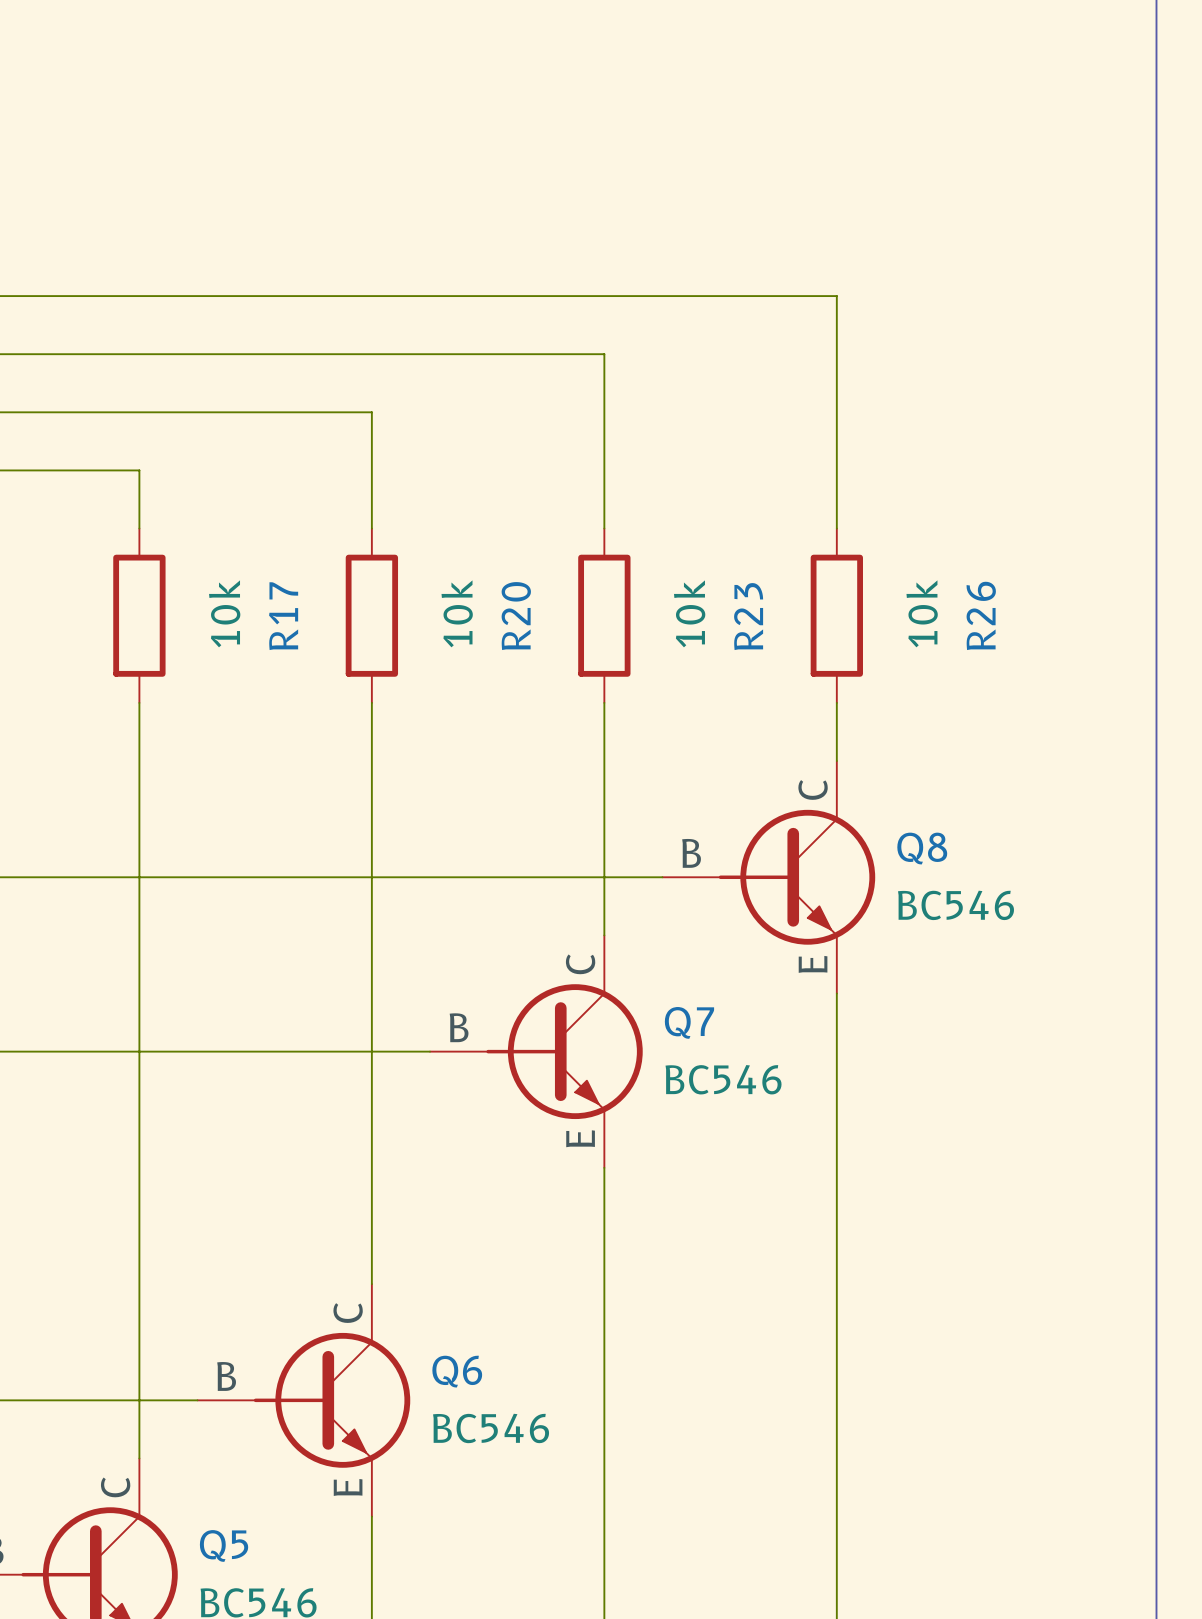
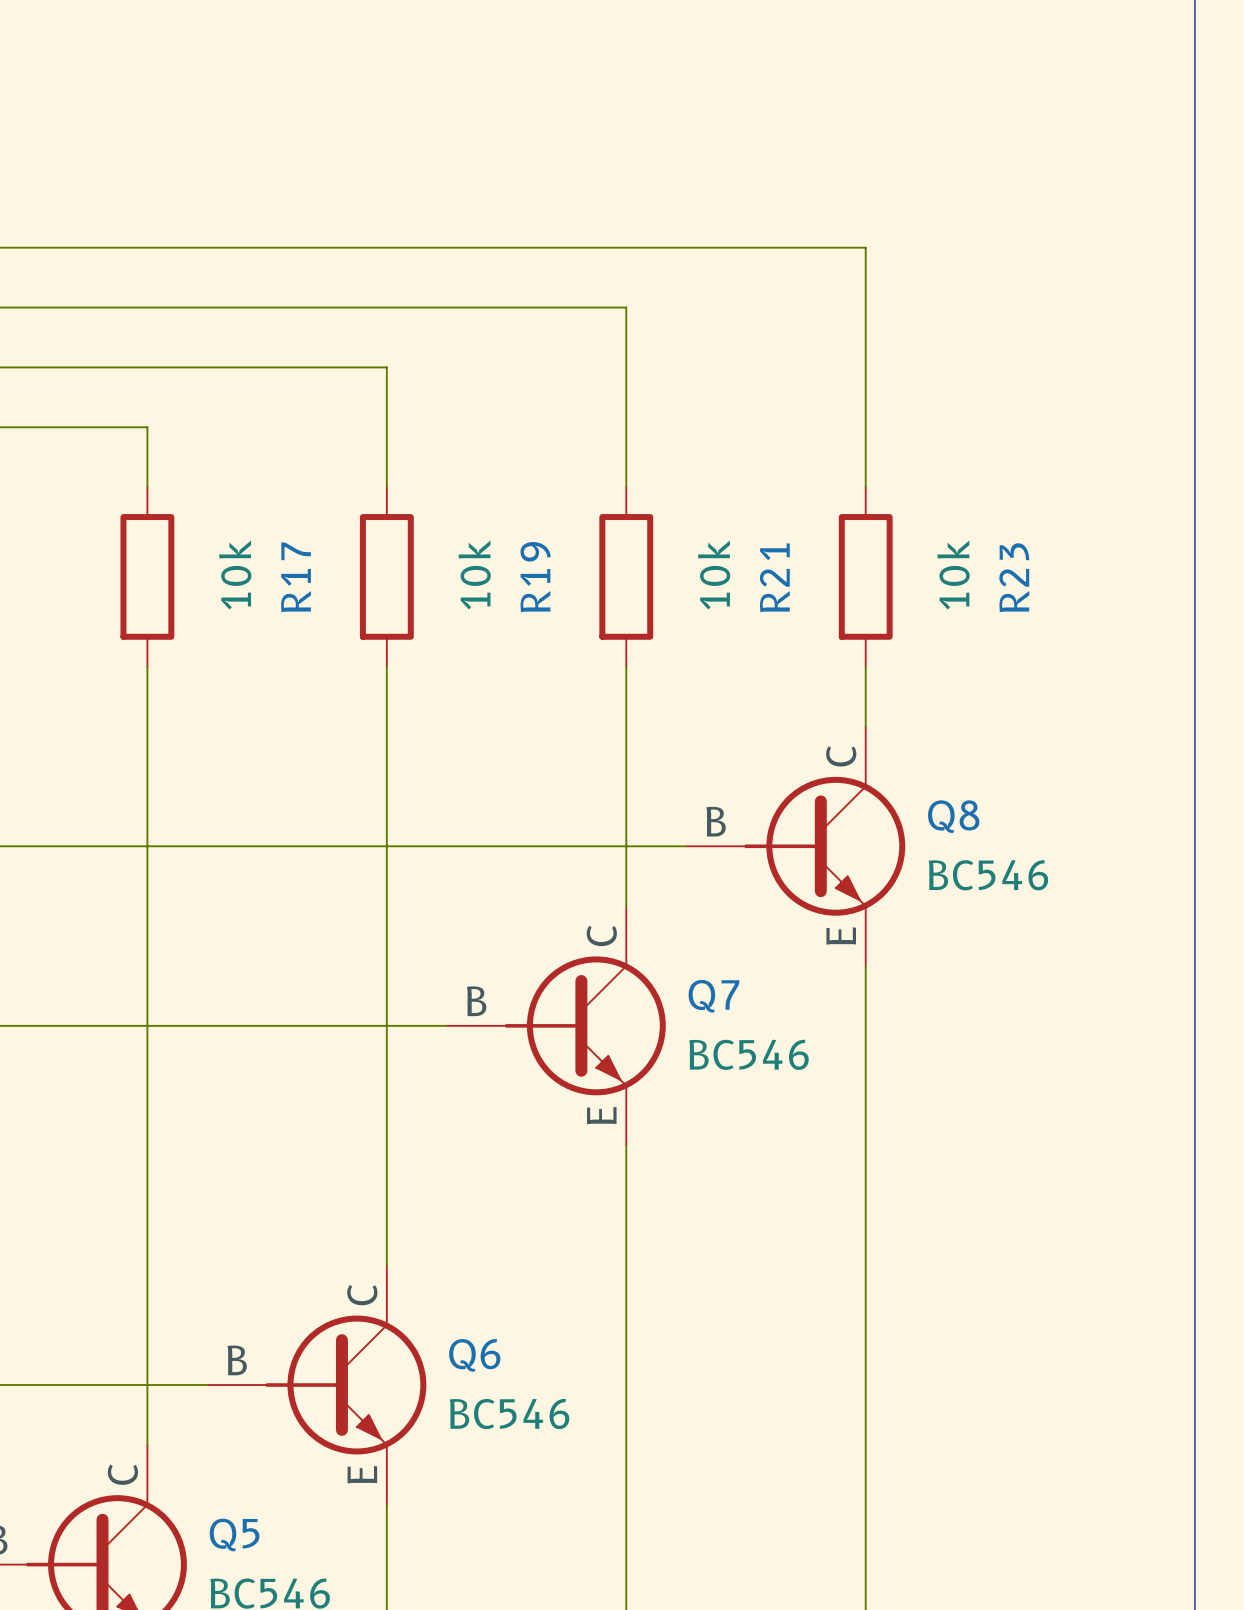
R26 name: R26 (981, 615) -> R23 (1014, 577)
R20 name: R20 (516, 616) -> R19 (535, 577)
R23 name: R23 (748, 616) -> R21 (774, 577)

